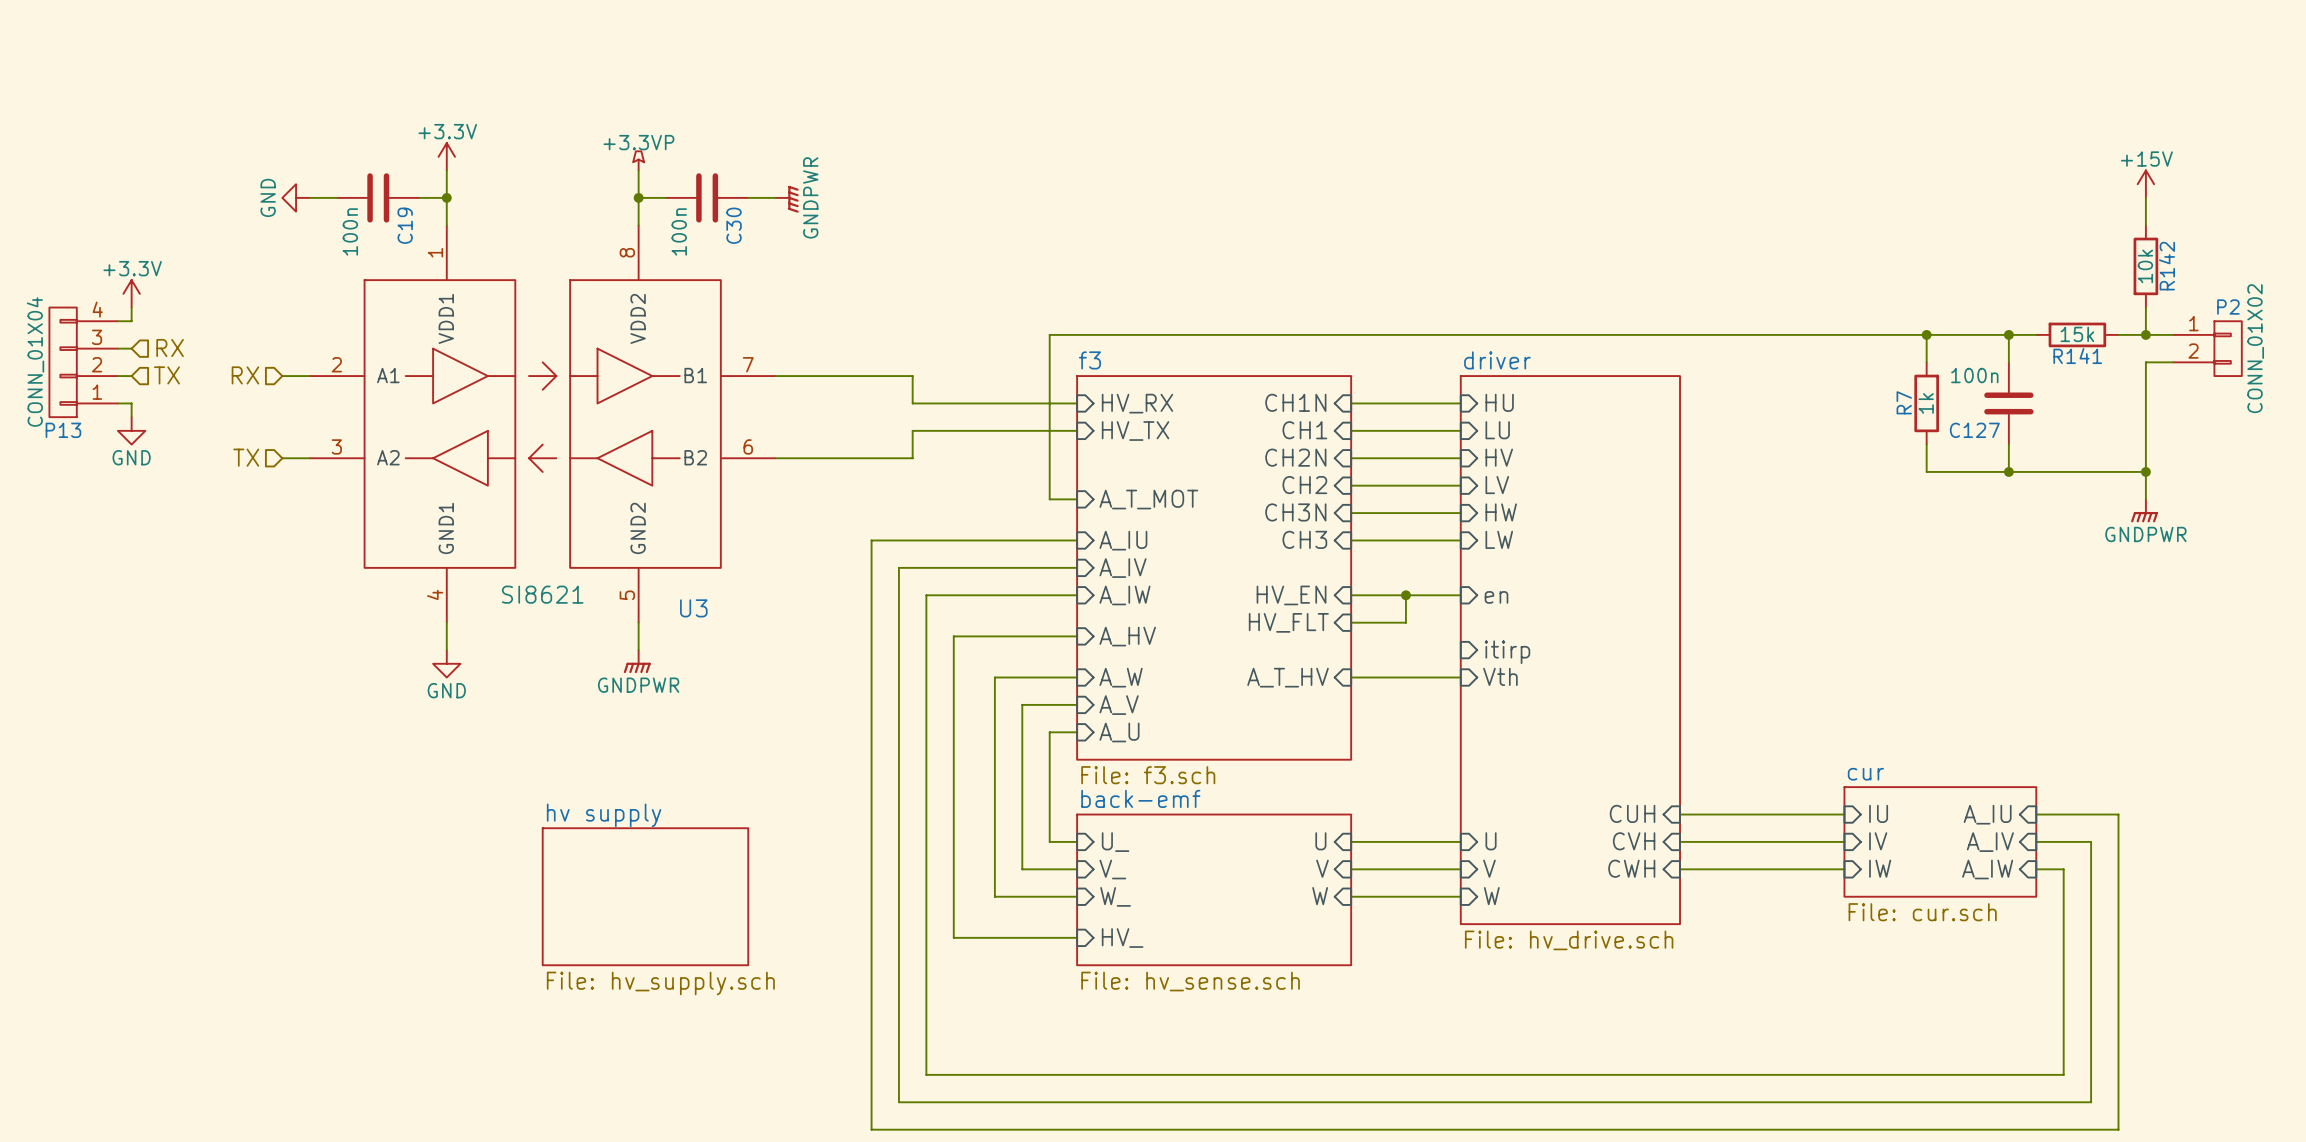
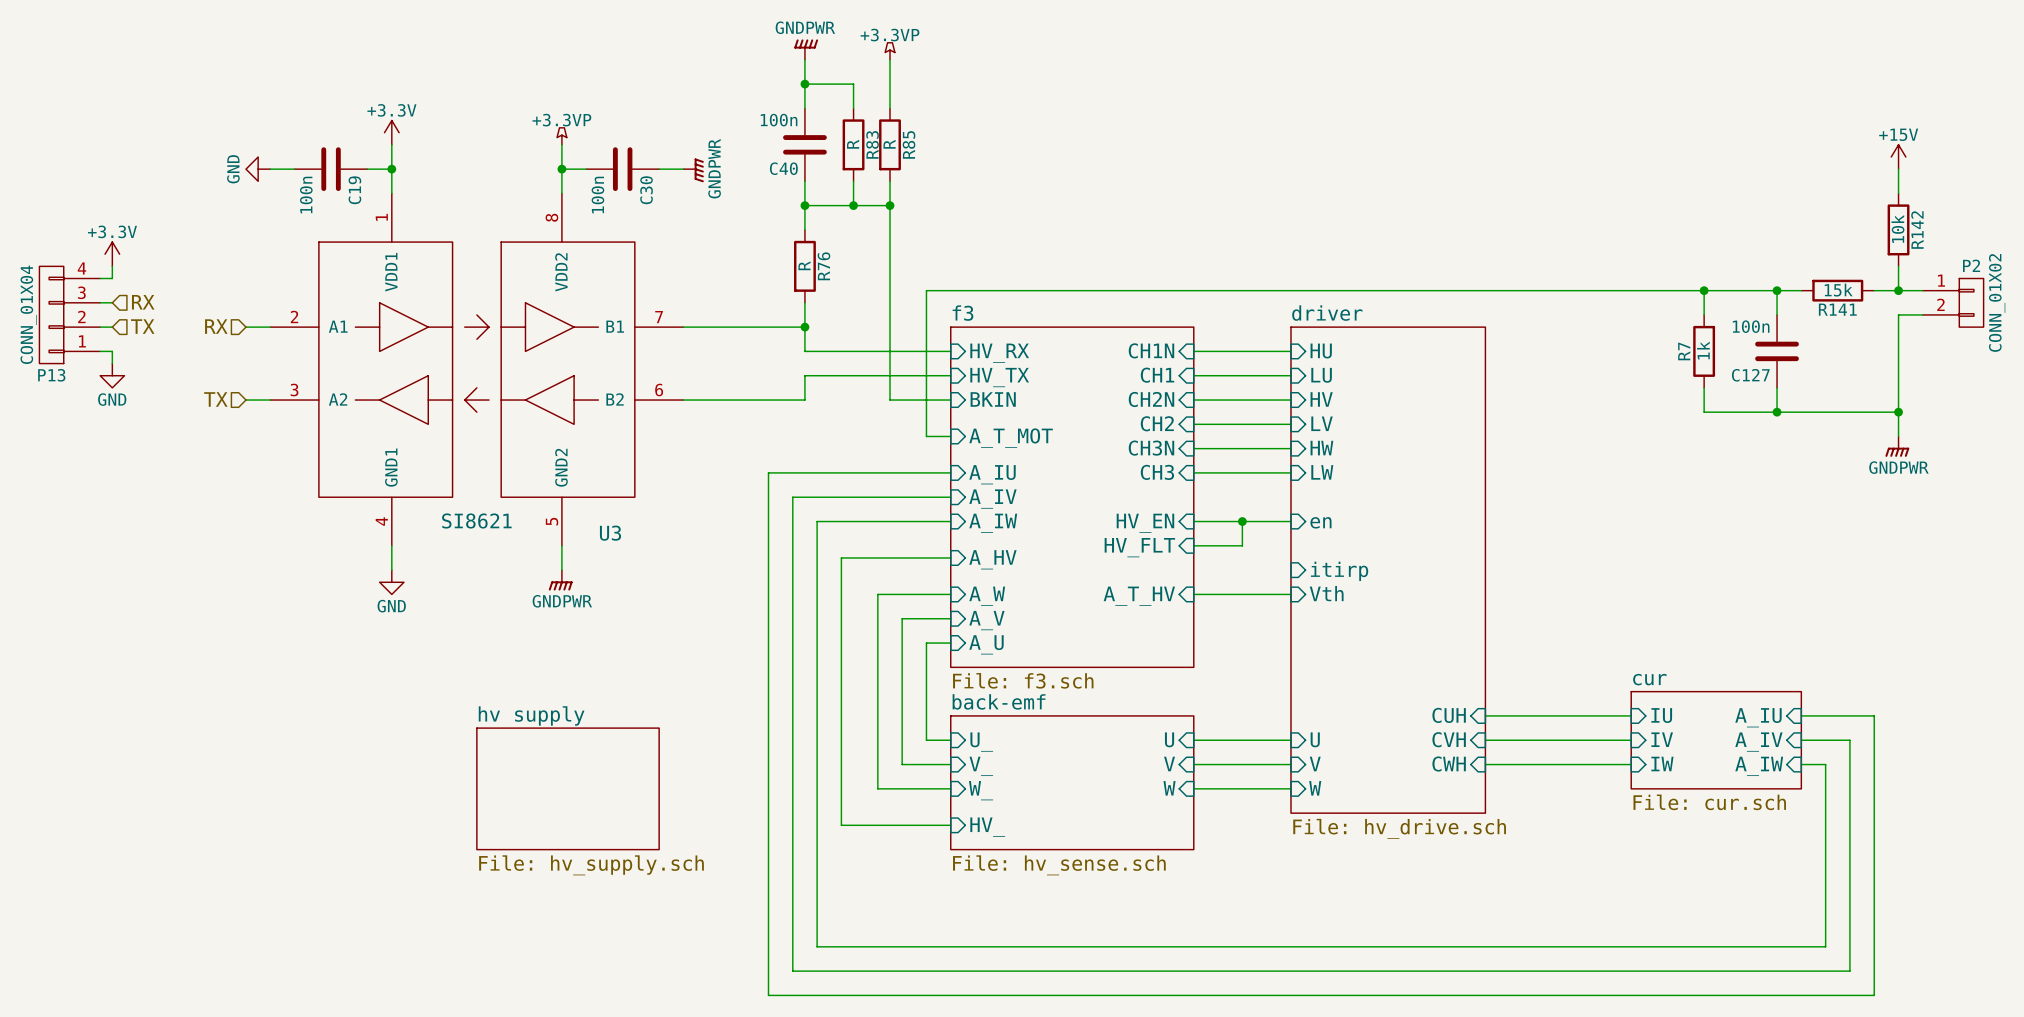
power symbol: none -> GNDPWR (806, 49)
power symbol: none -> +3.3VP (890, 51)
wire: none -> (804, 59) (804, 108)
wire: none -> (890, 59) (890, 108)
wire: none -> (804, 84) (853, 84) (853, 108)
junction: none -> (804, 84)
C40: none -> 100n (804, 144)
R83: none -> R (853, 144)
R85: none -> R (890, 144)
wire: none -> (804, 181) (804, 229)
wire: none -> (853, 181) (853, 205)
wire: none -> (890, 181) (890, 400) (950, 400)
wire: none -> (804, 205) (890, 205)
junction: none -> (804, 205)
junction: none -> (853, 205)
junction: none -> (890, 205)
R76: none -> R (804, 266)
wire: none -> (804, 302) (804, 327)
junction: none -> (804, 327)
sheet pin: none -> BKIN (993, 399)

